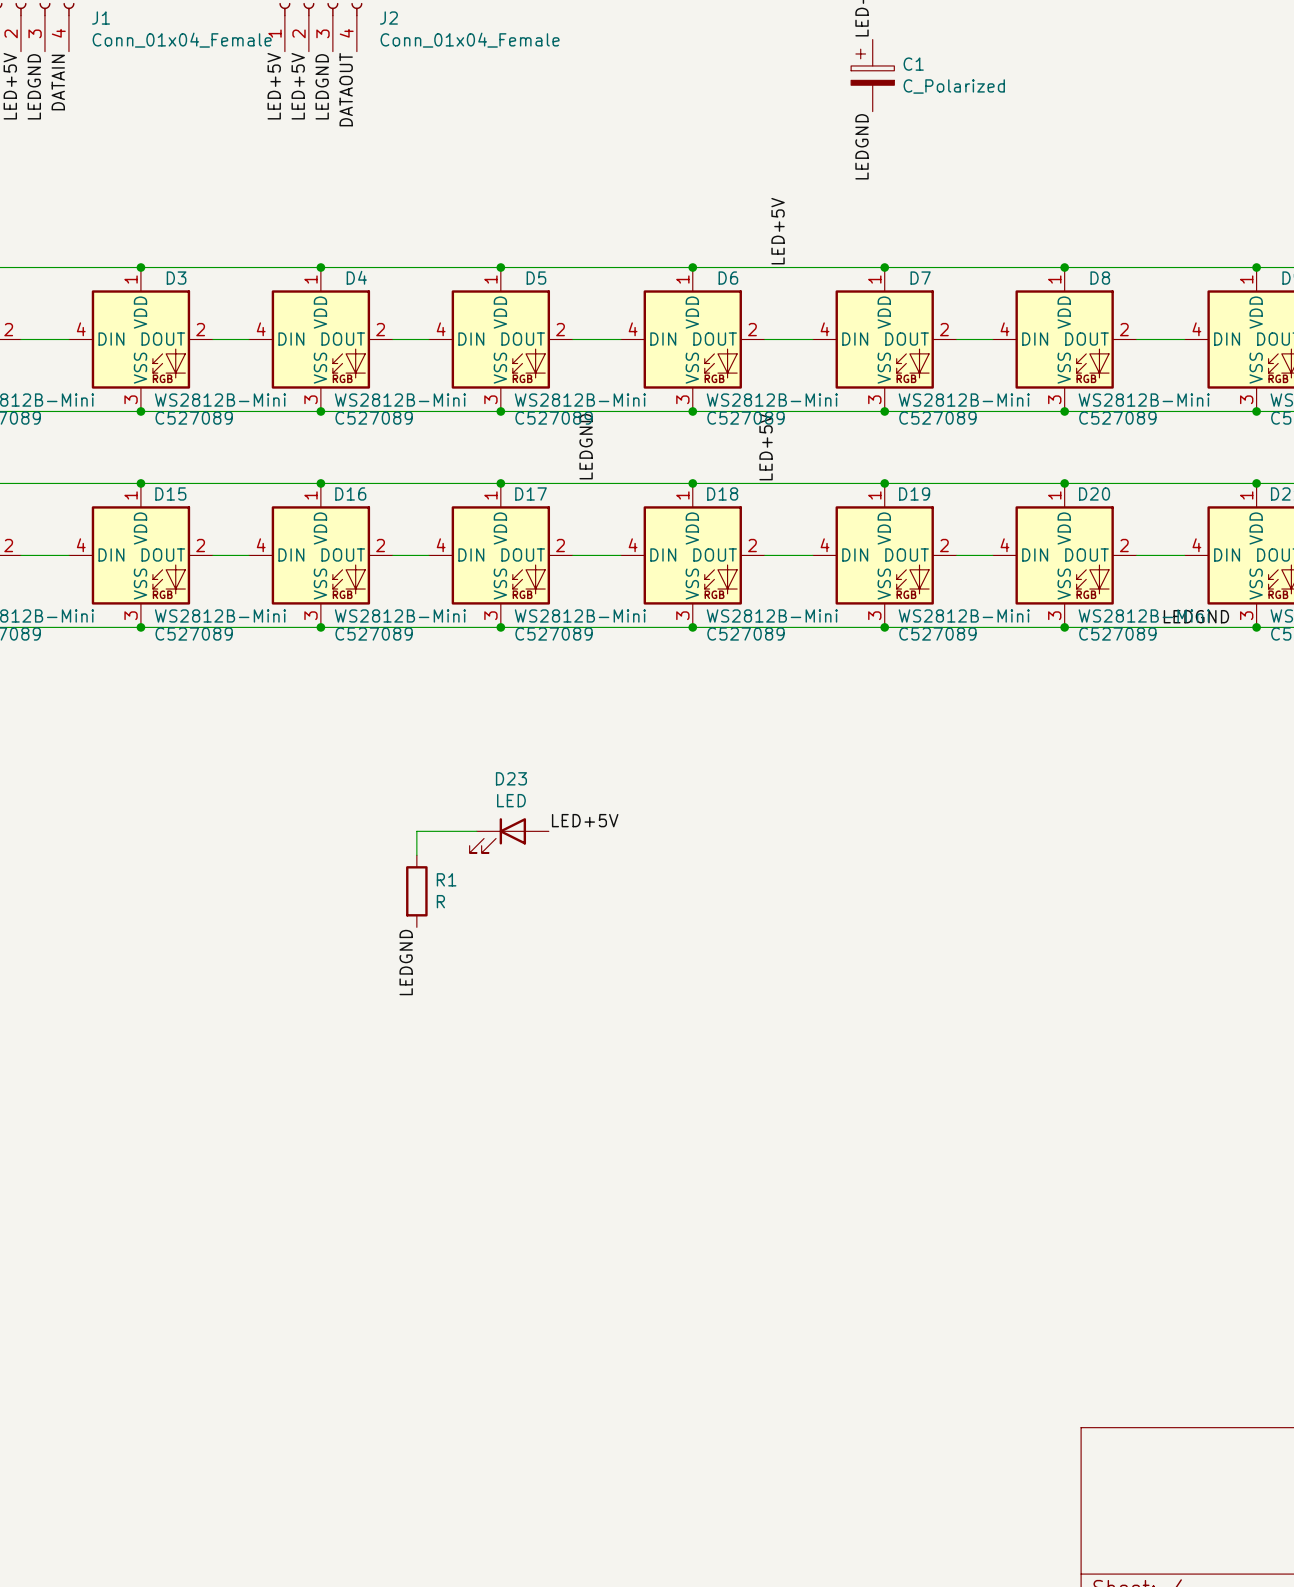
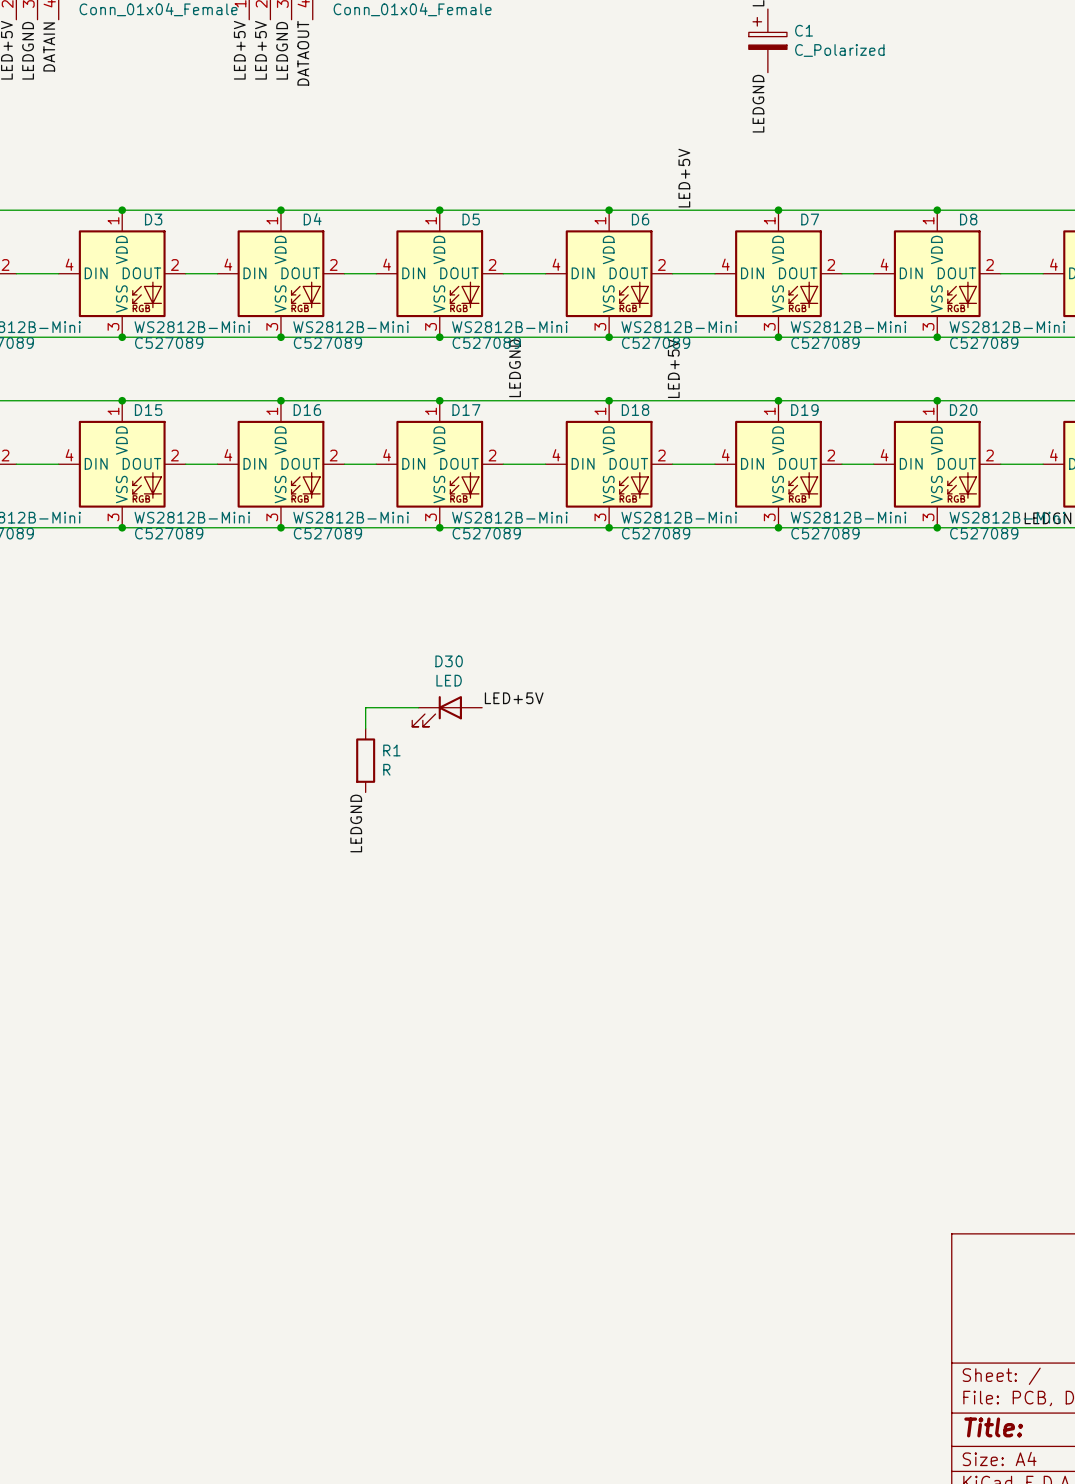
D23 name: D23 (511, 778) -> D30 (449, 661)

